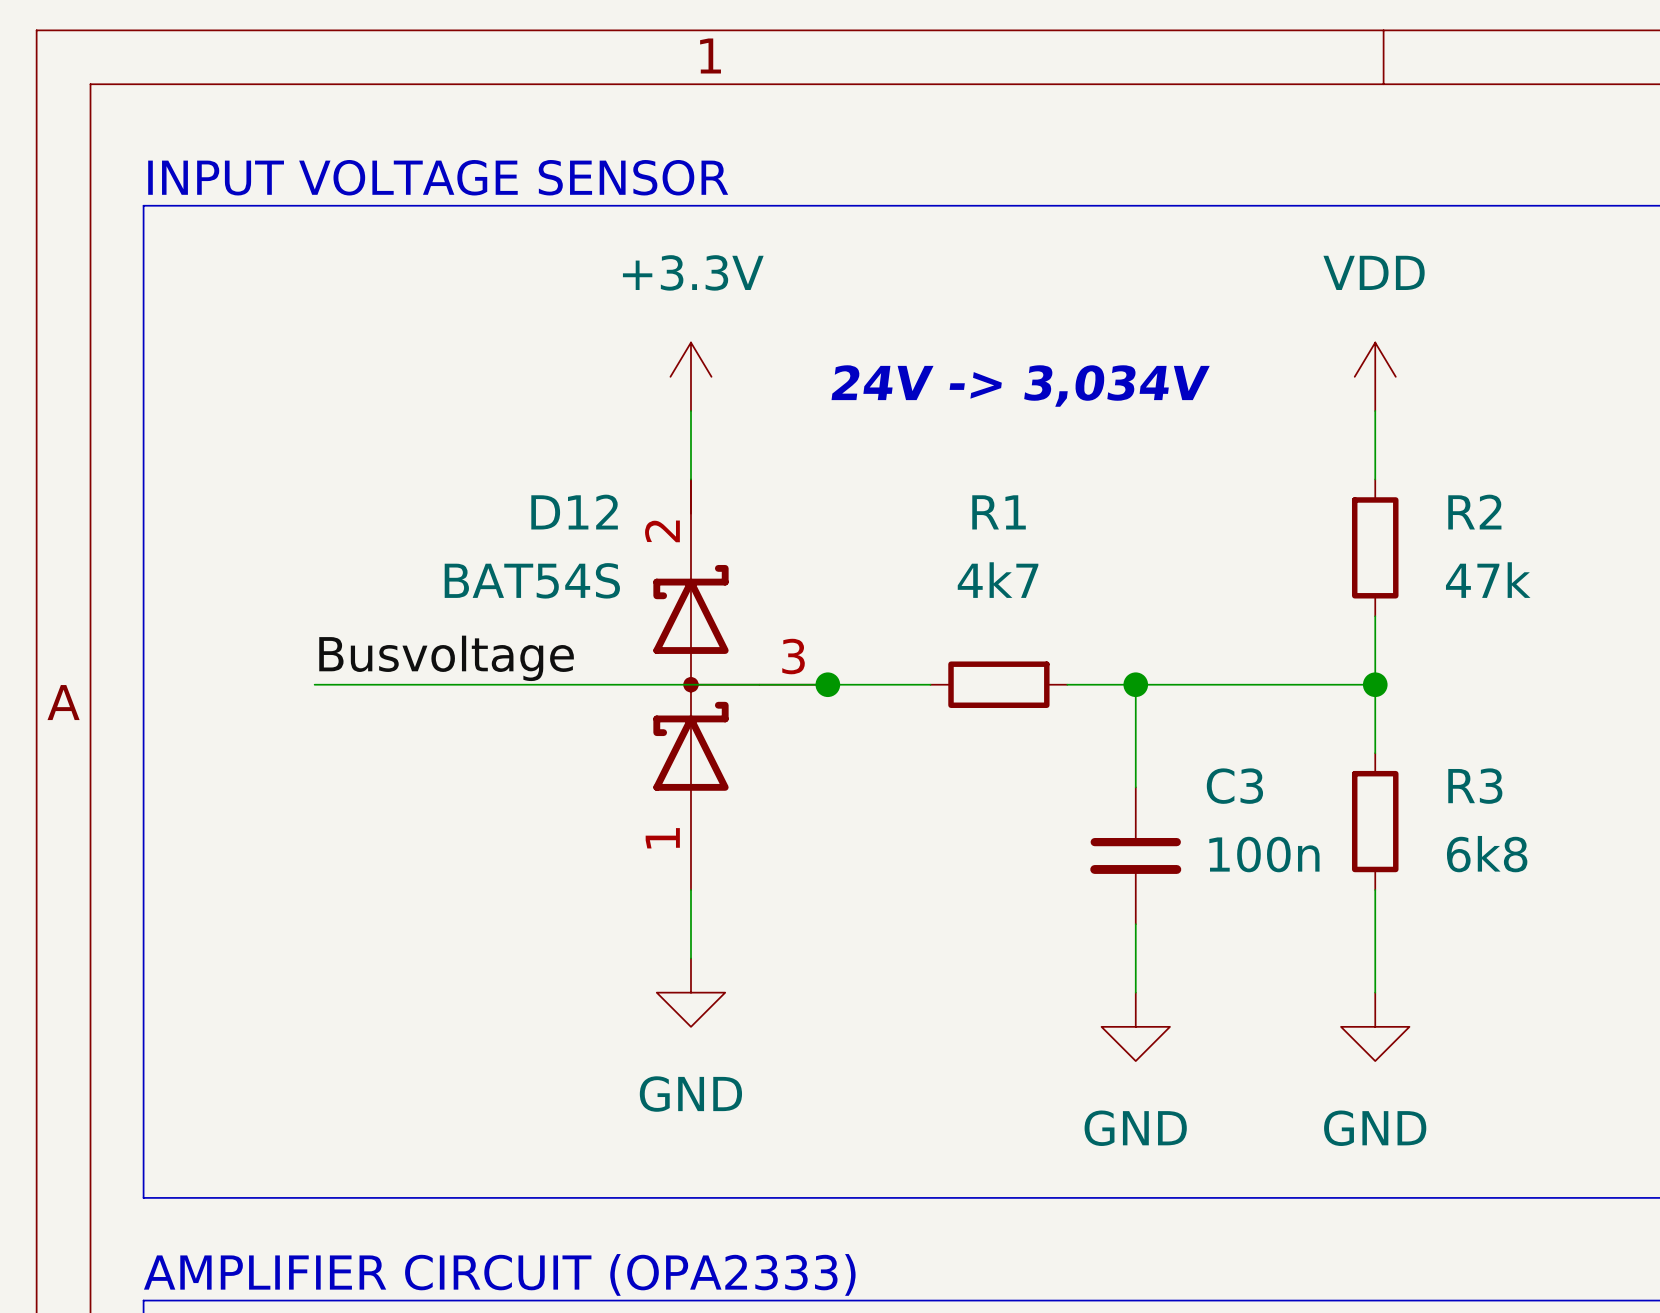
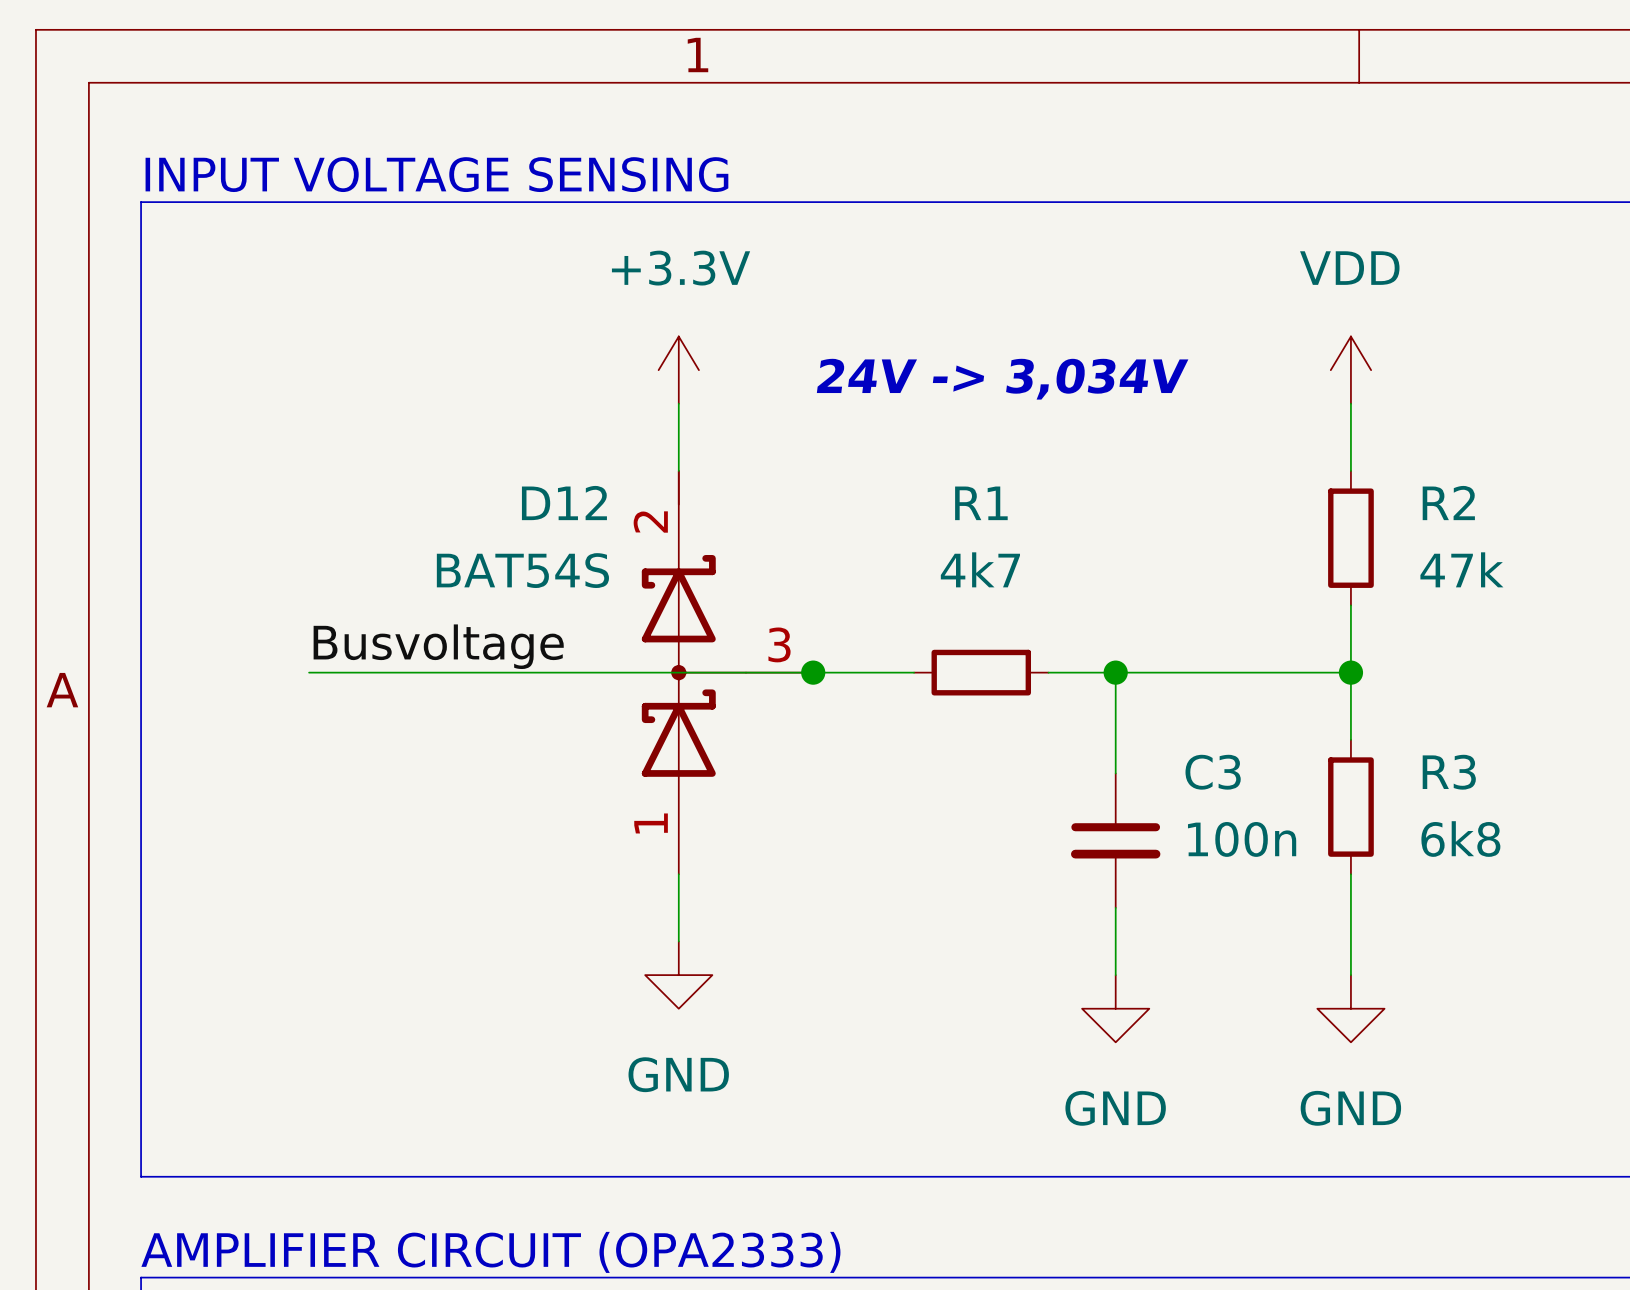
text: INPUT VOLTAGE SENSOR (438, 177) -> INPUT VOLTAGE SENSING (436, 174)

